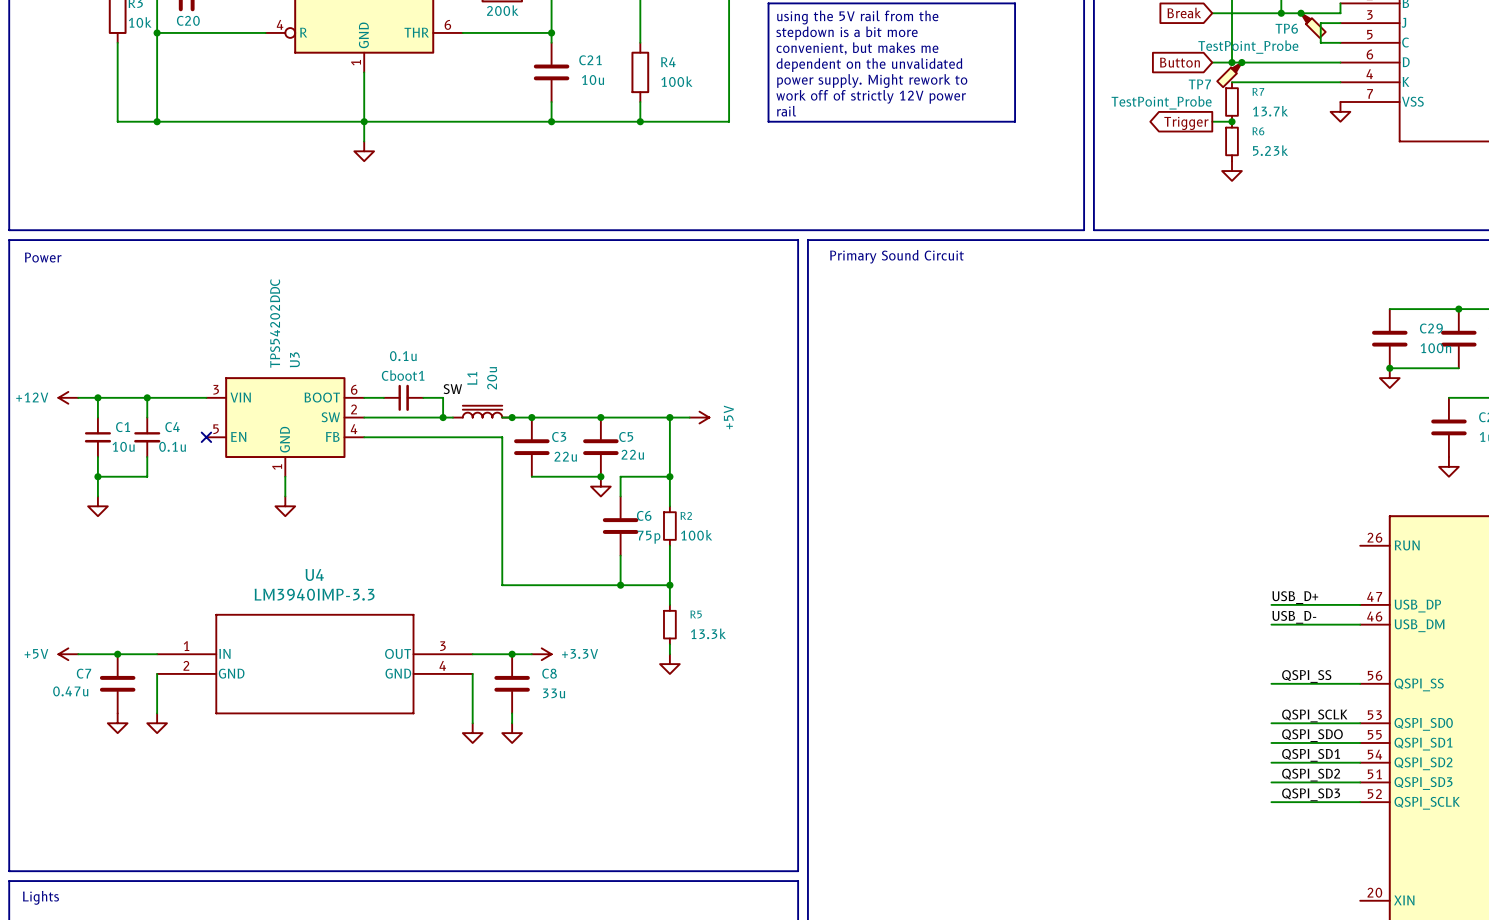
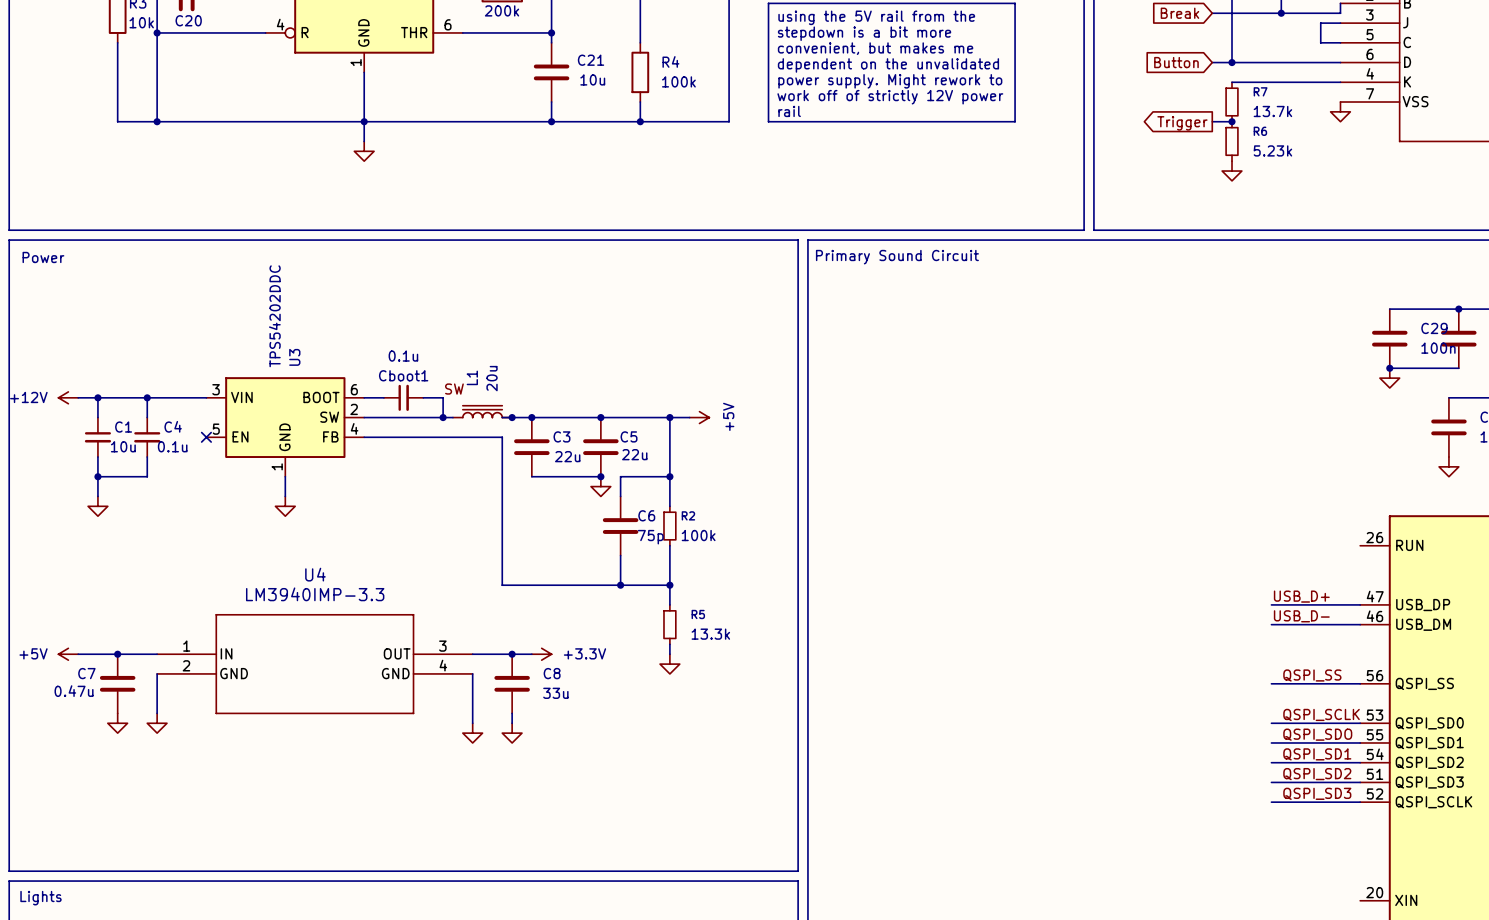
junction: (1301, 13) -> none
TP6: TestPoint_Probe (1313, 25) -> none
junction: (1241, 62) -> none
TP7: TestPoint_Probe (1229, 74) -> none

